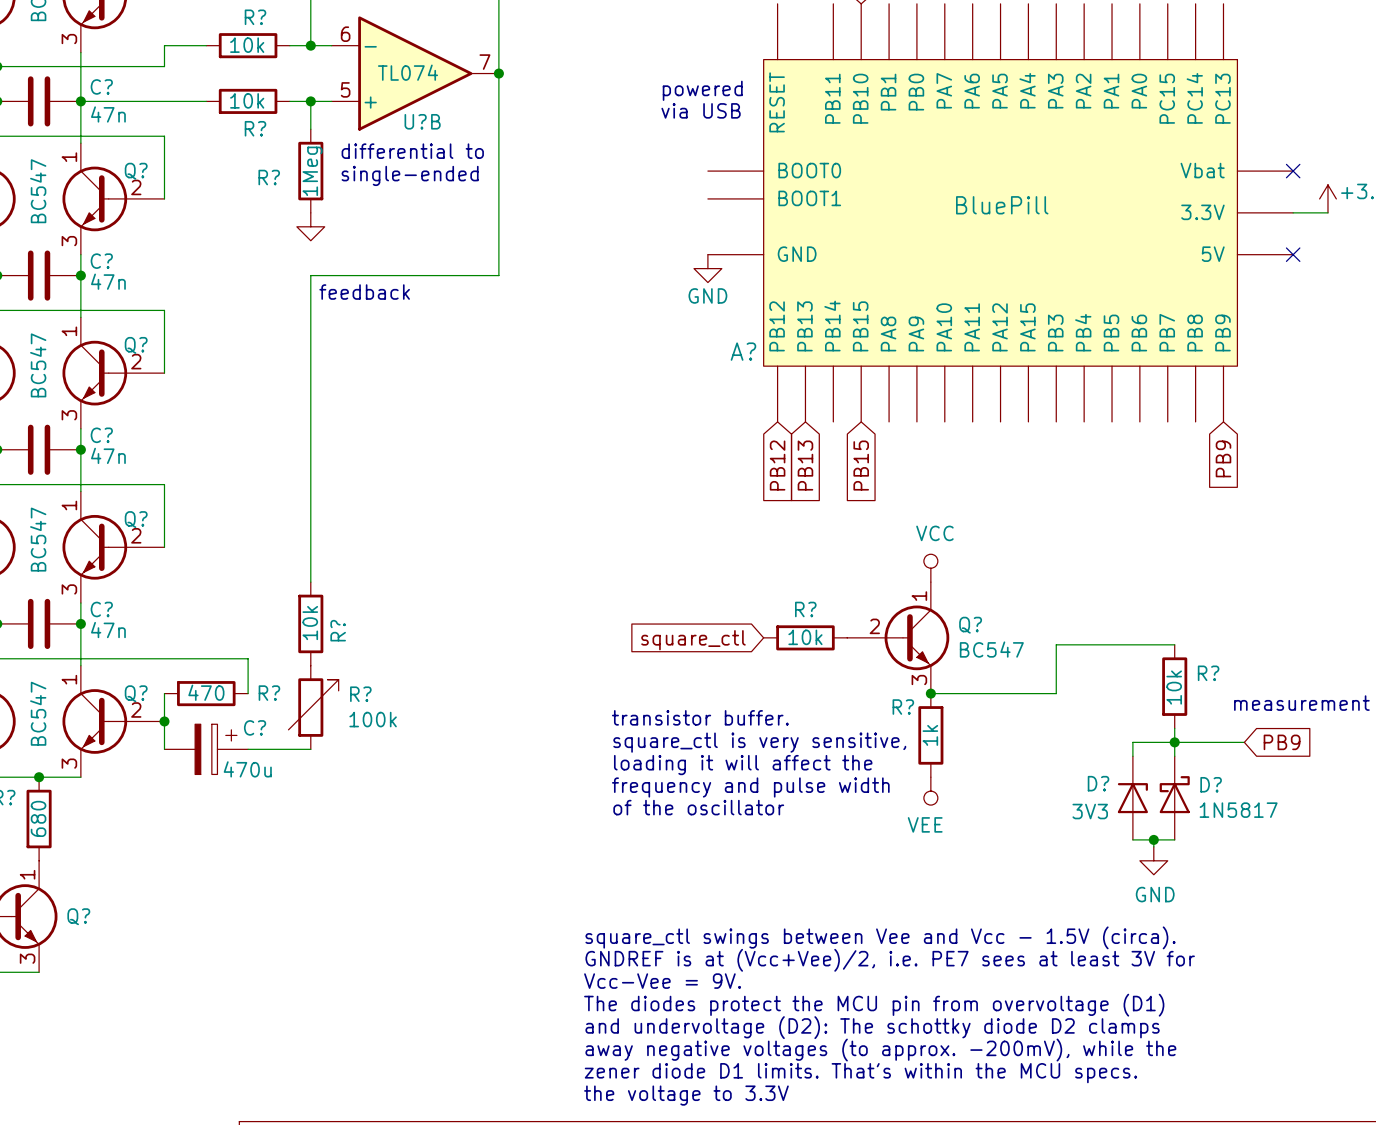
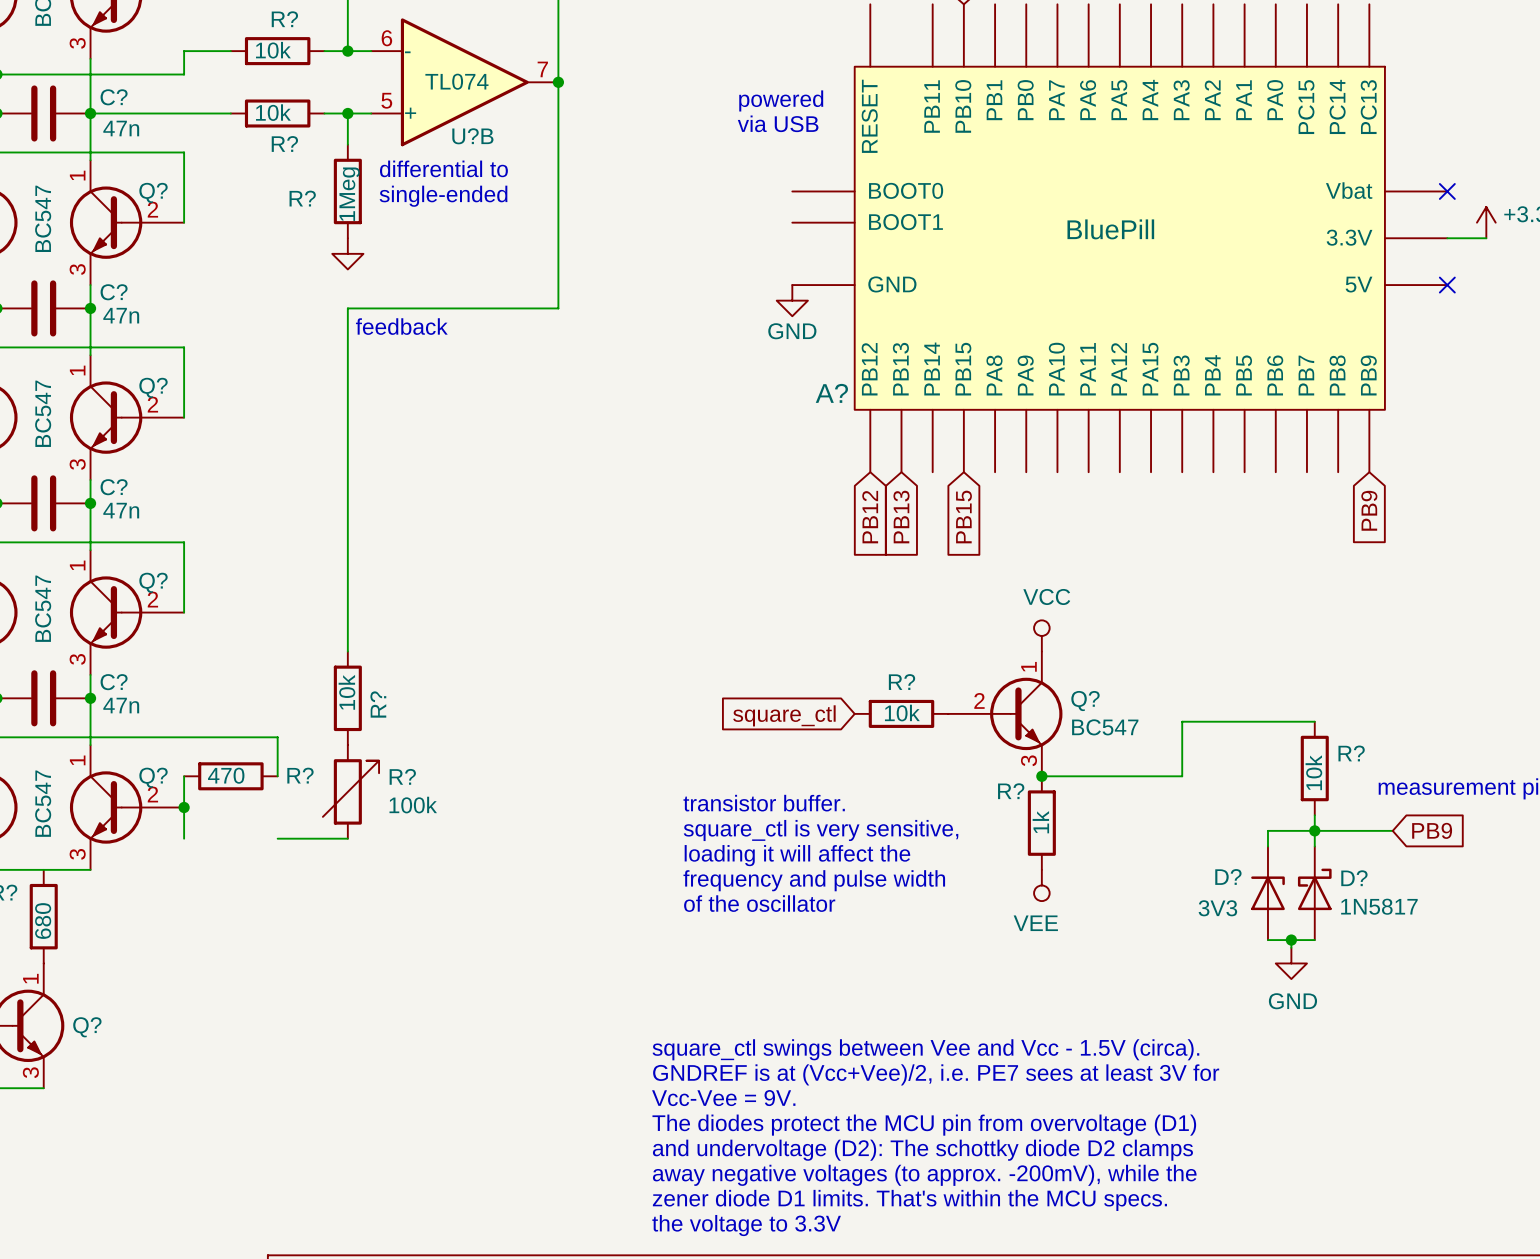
C?: 470u (206, 749) -> none
junction: (39, 777) -> none

